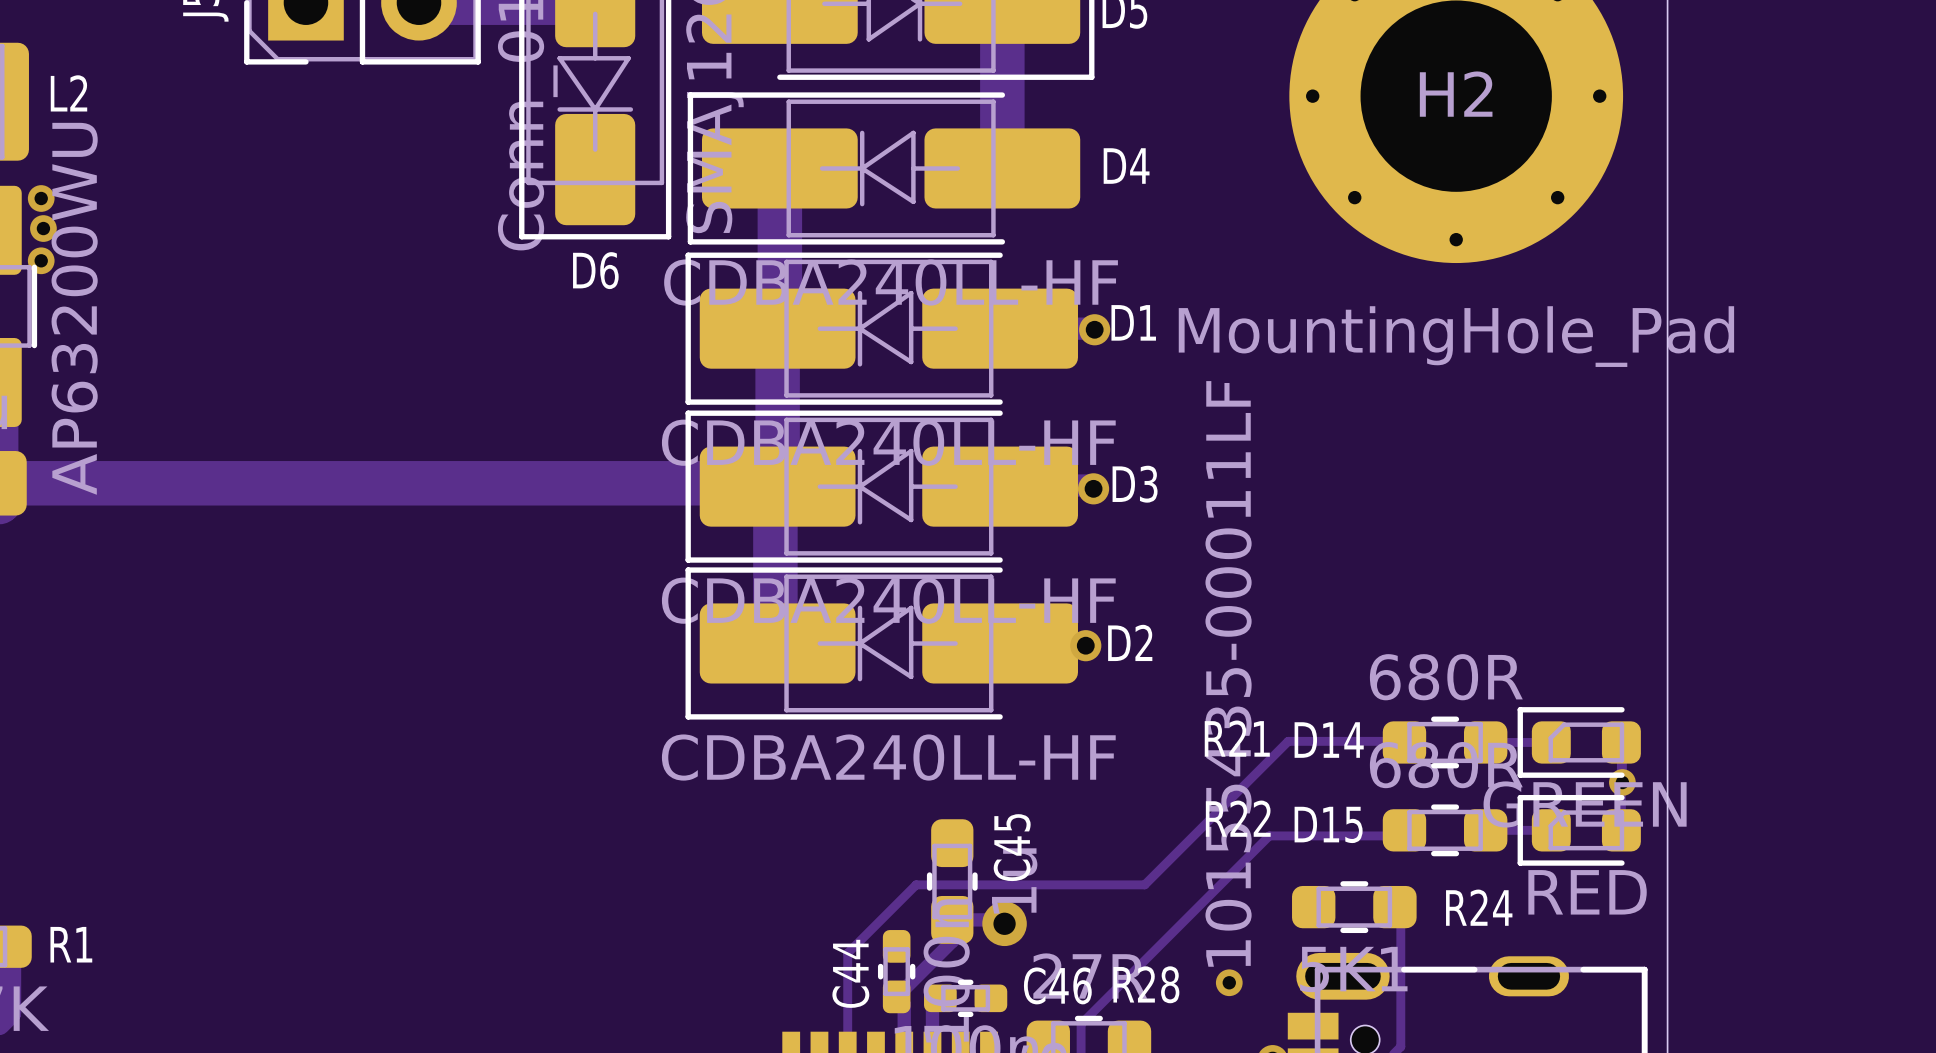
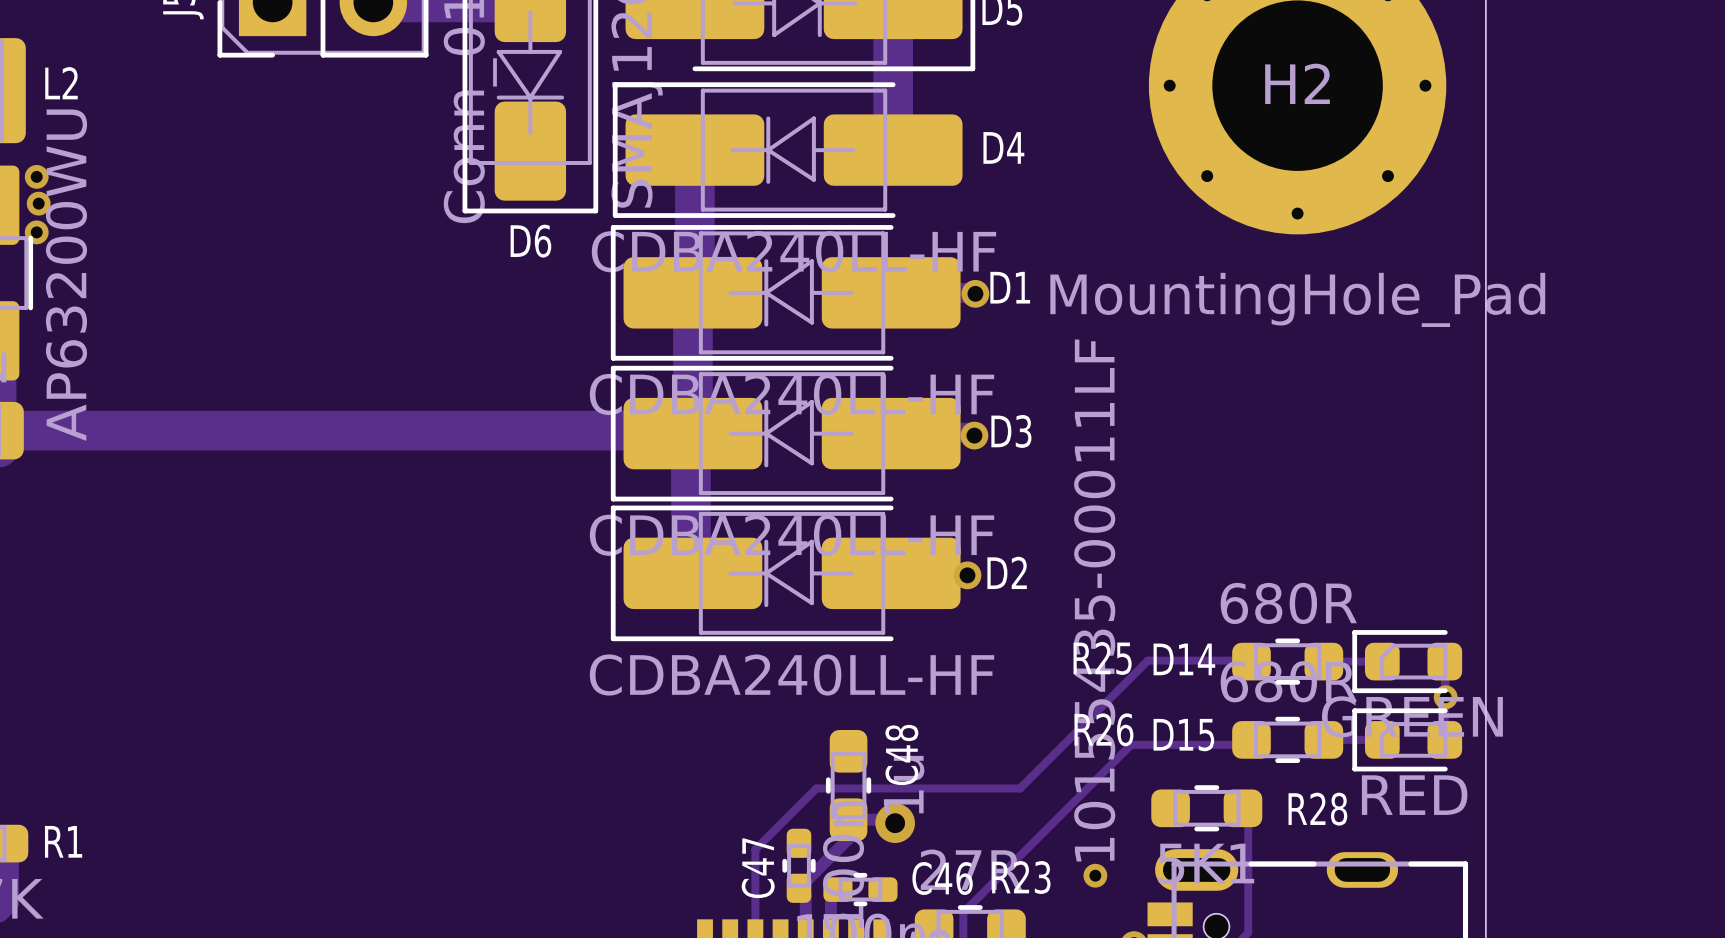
R21 name: R21 (1237, 738) -> R25 (1102, 658)
R22 name: R22 (1238, 818) -> R26 (1103, 729)
C45 name: C45 (1012, 847) -> C48 (901, 754)
R24 name: R24 (1479, 907) -> R28 (1317, 809)
C44 name: C44 (850, 973) -> C47 (758, 868)
R28 name: R28 (1146, 984) -> R23 (1021, 877)

